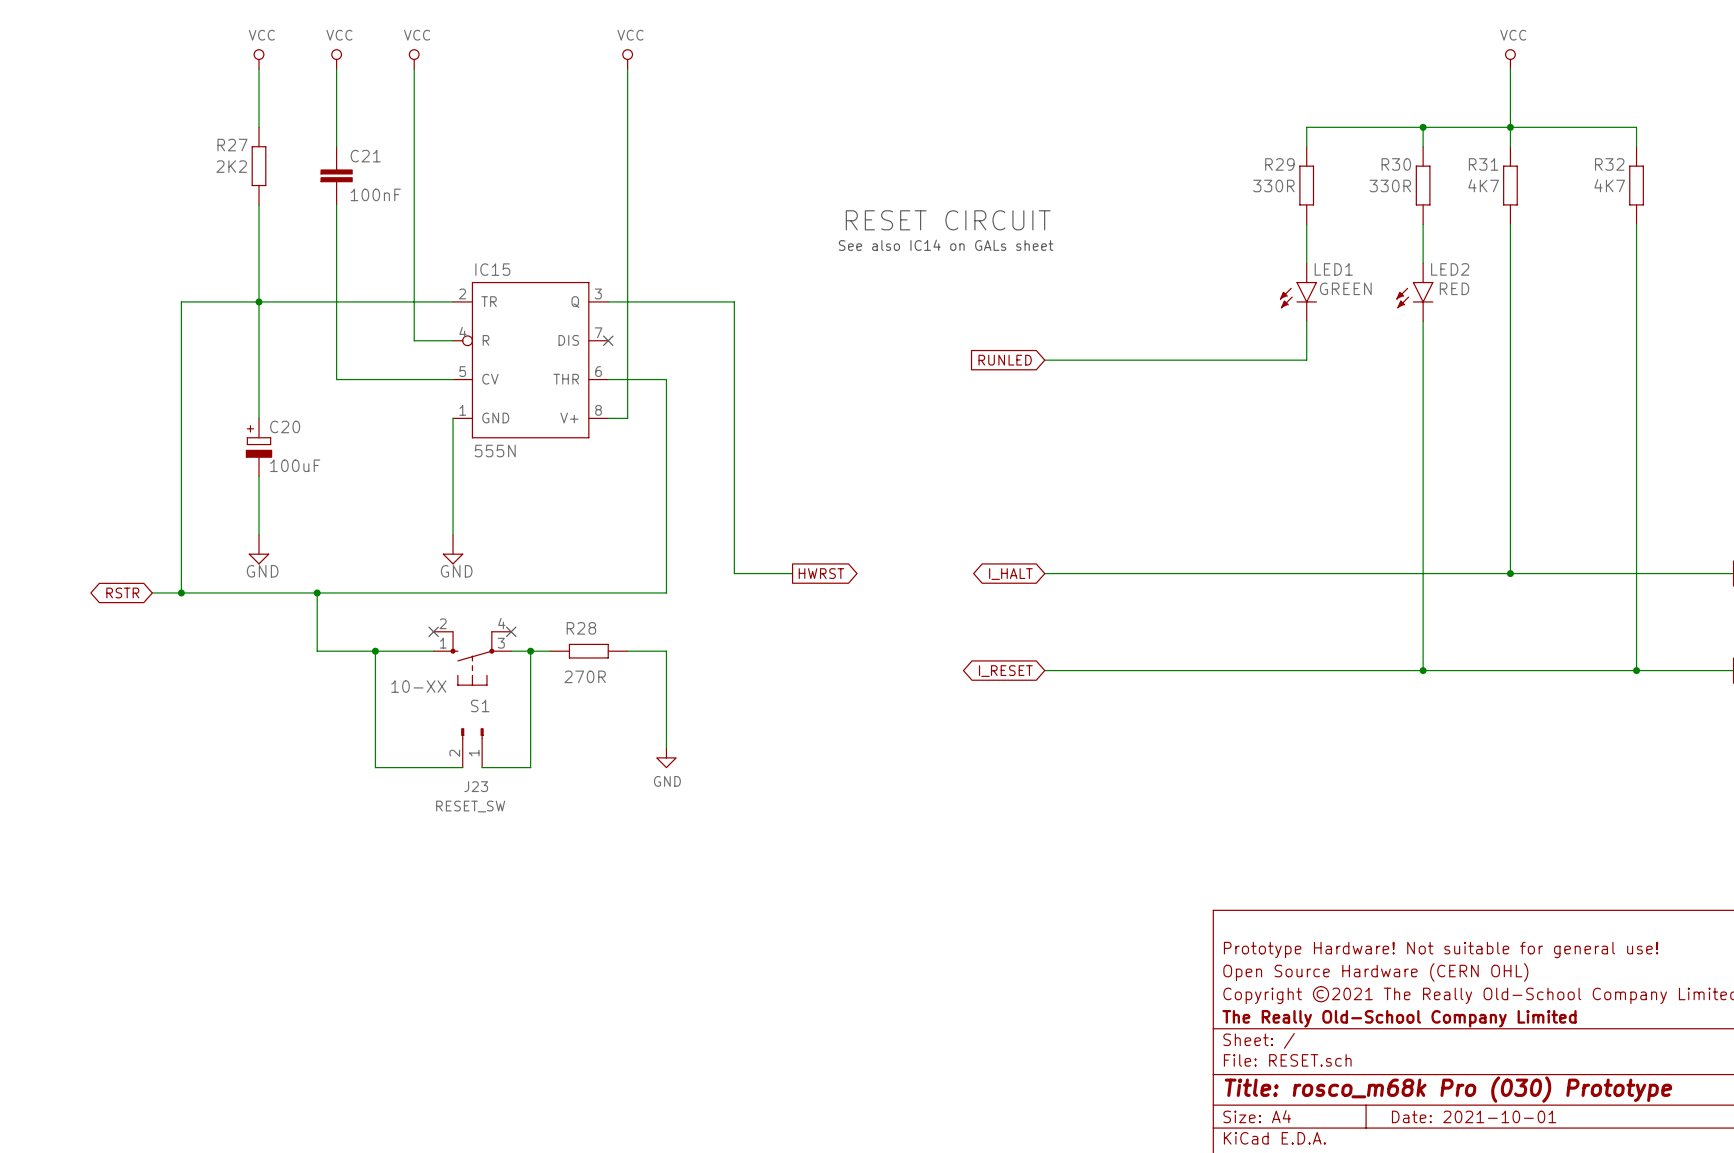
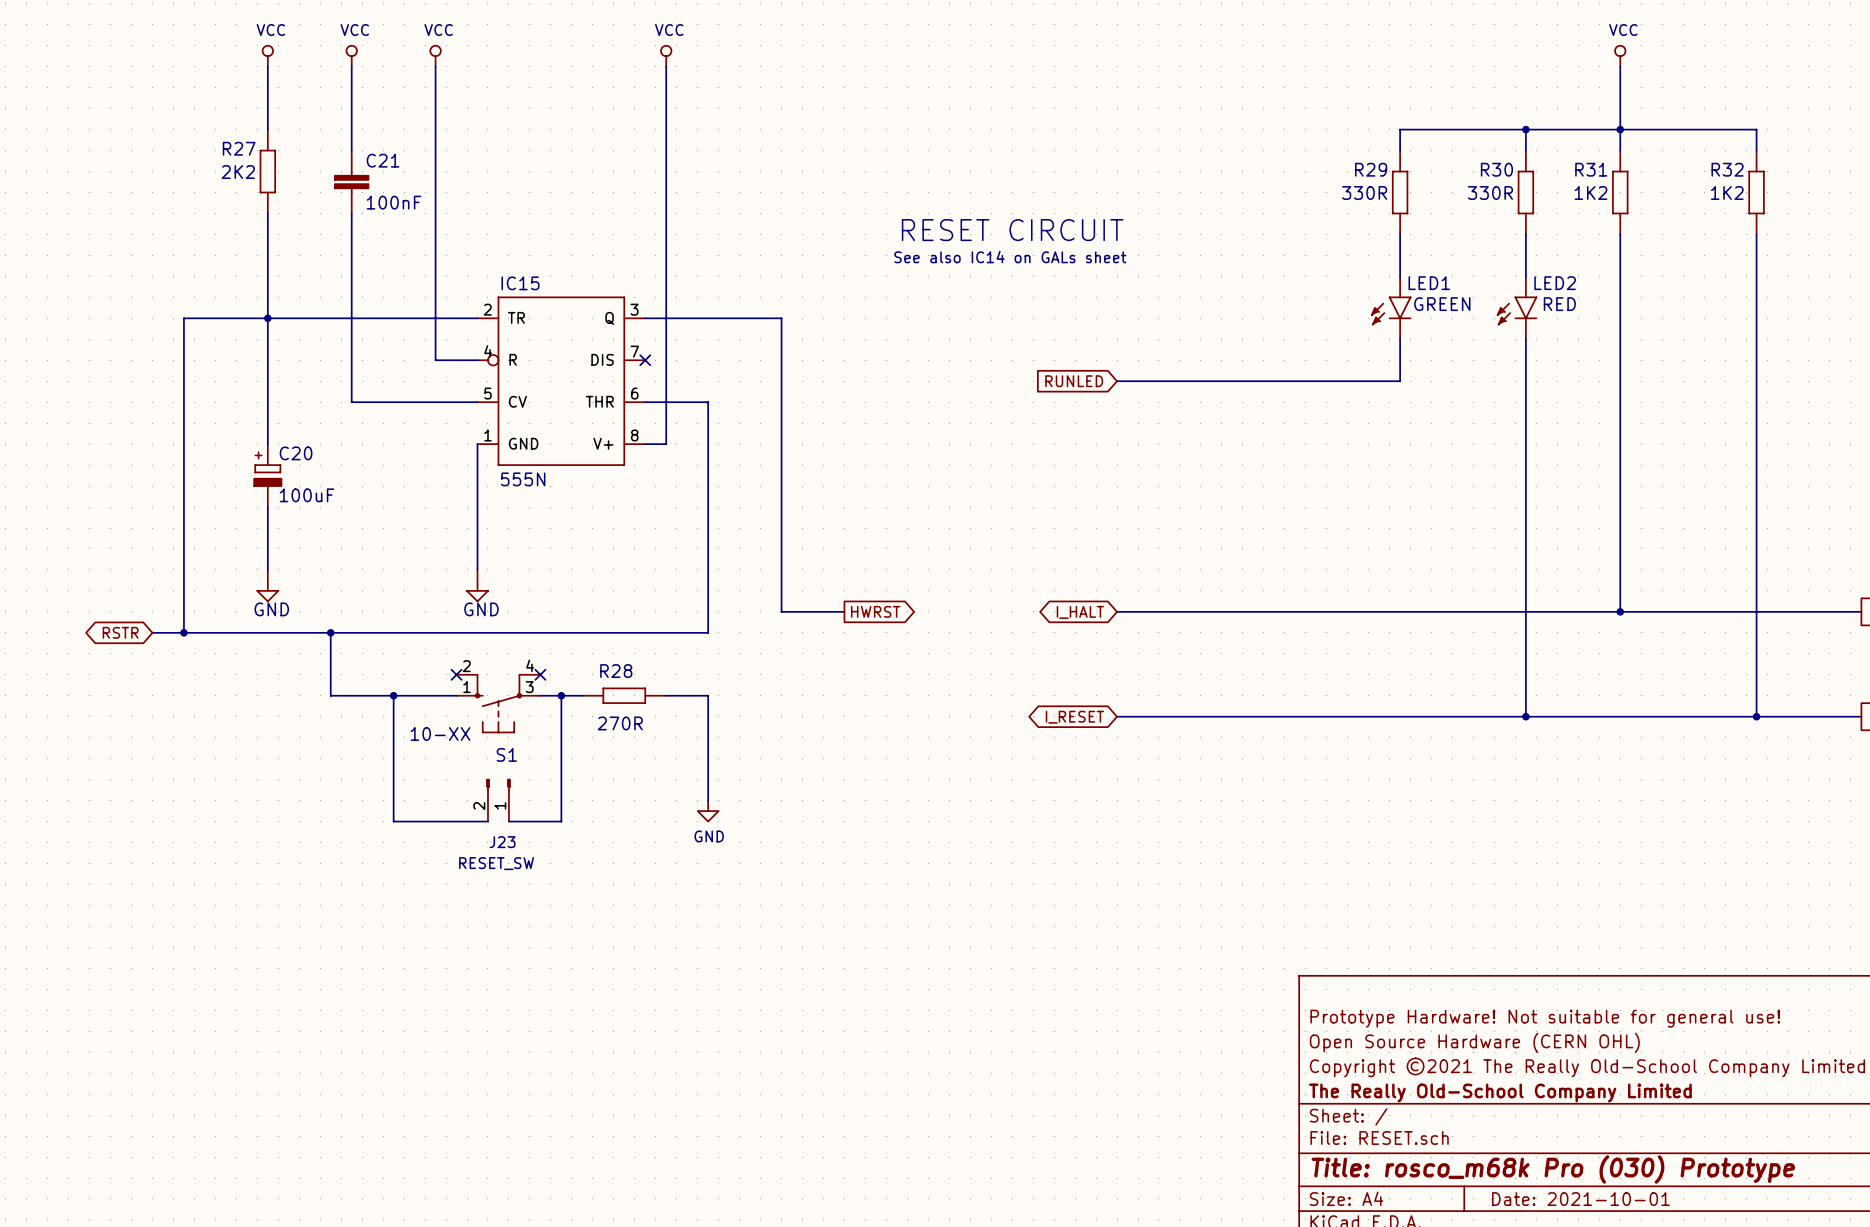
R31 value: 4K7 (1483, 185) -> 1K2 (1590, 192)
R32 value: 4K7 (1609, 185) -> 1K2 (1727, 192)

